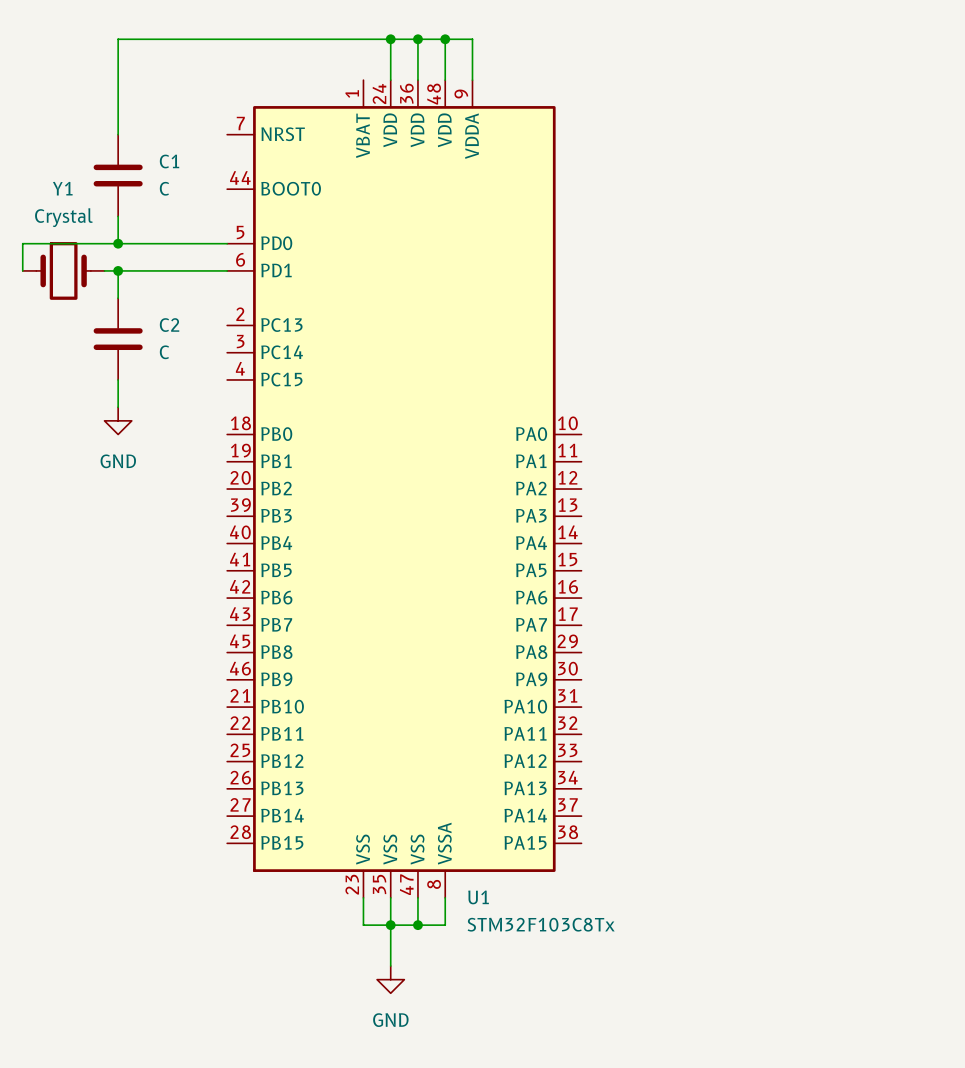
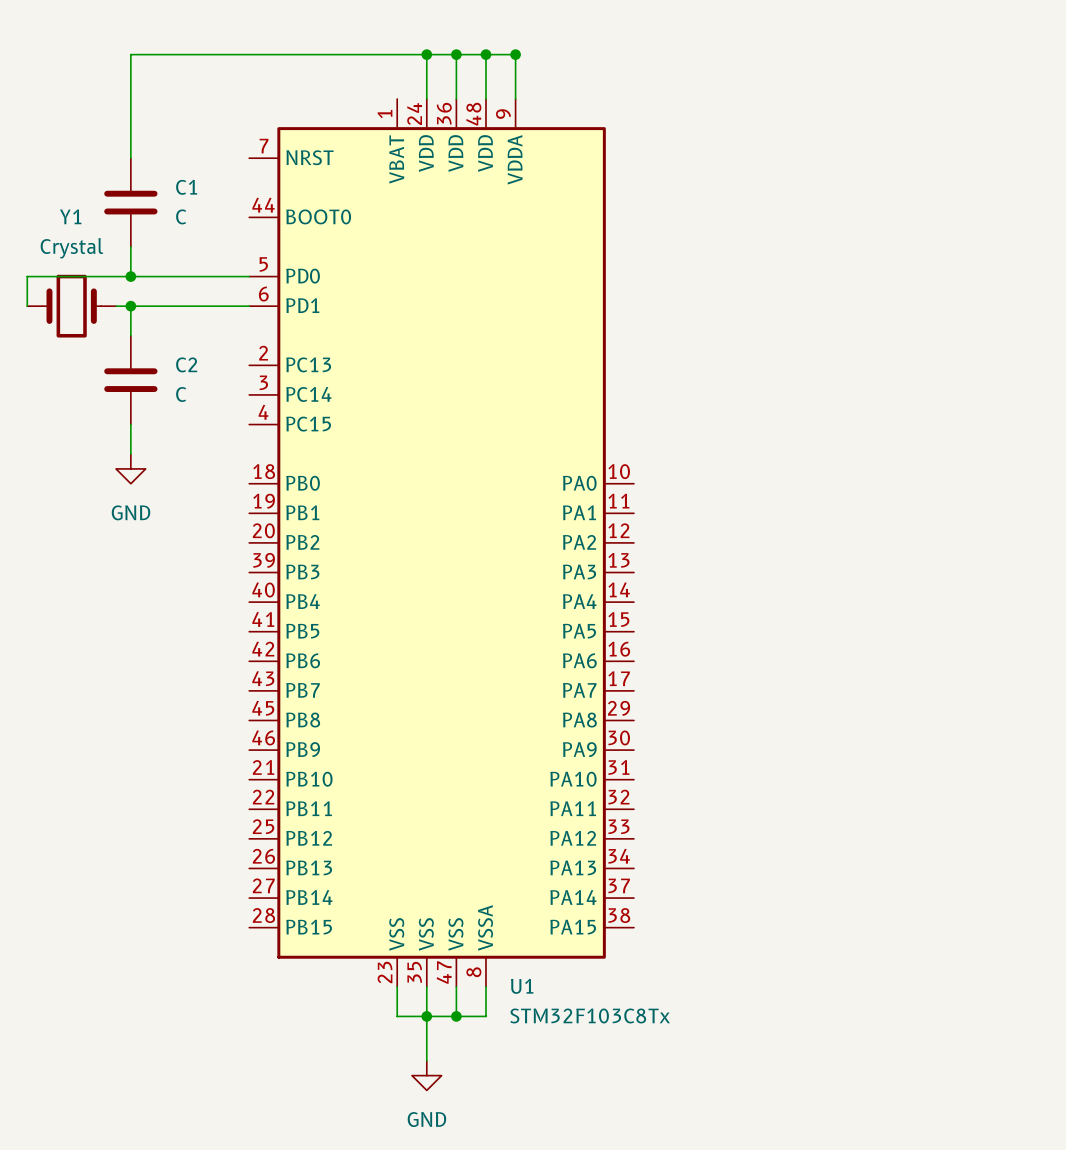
junction: none -> (515, 54)

